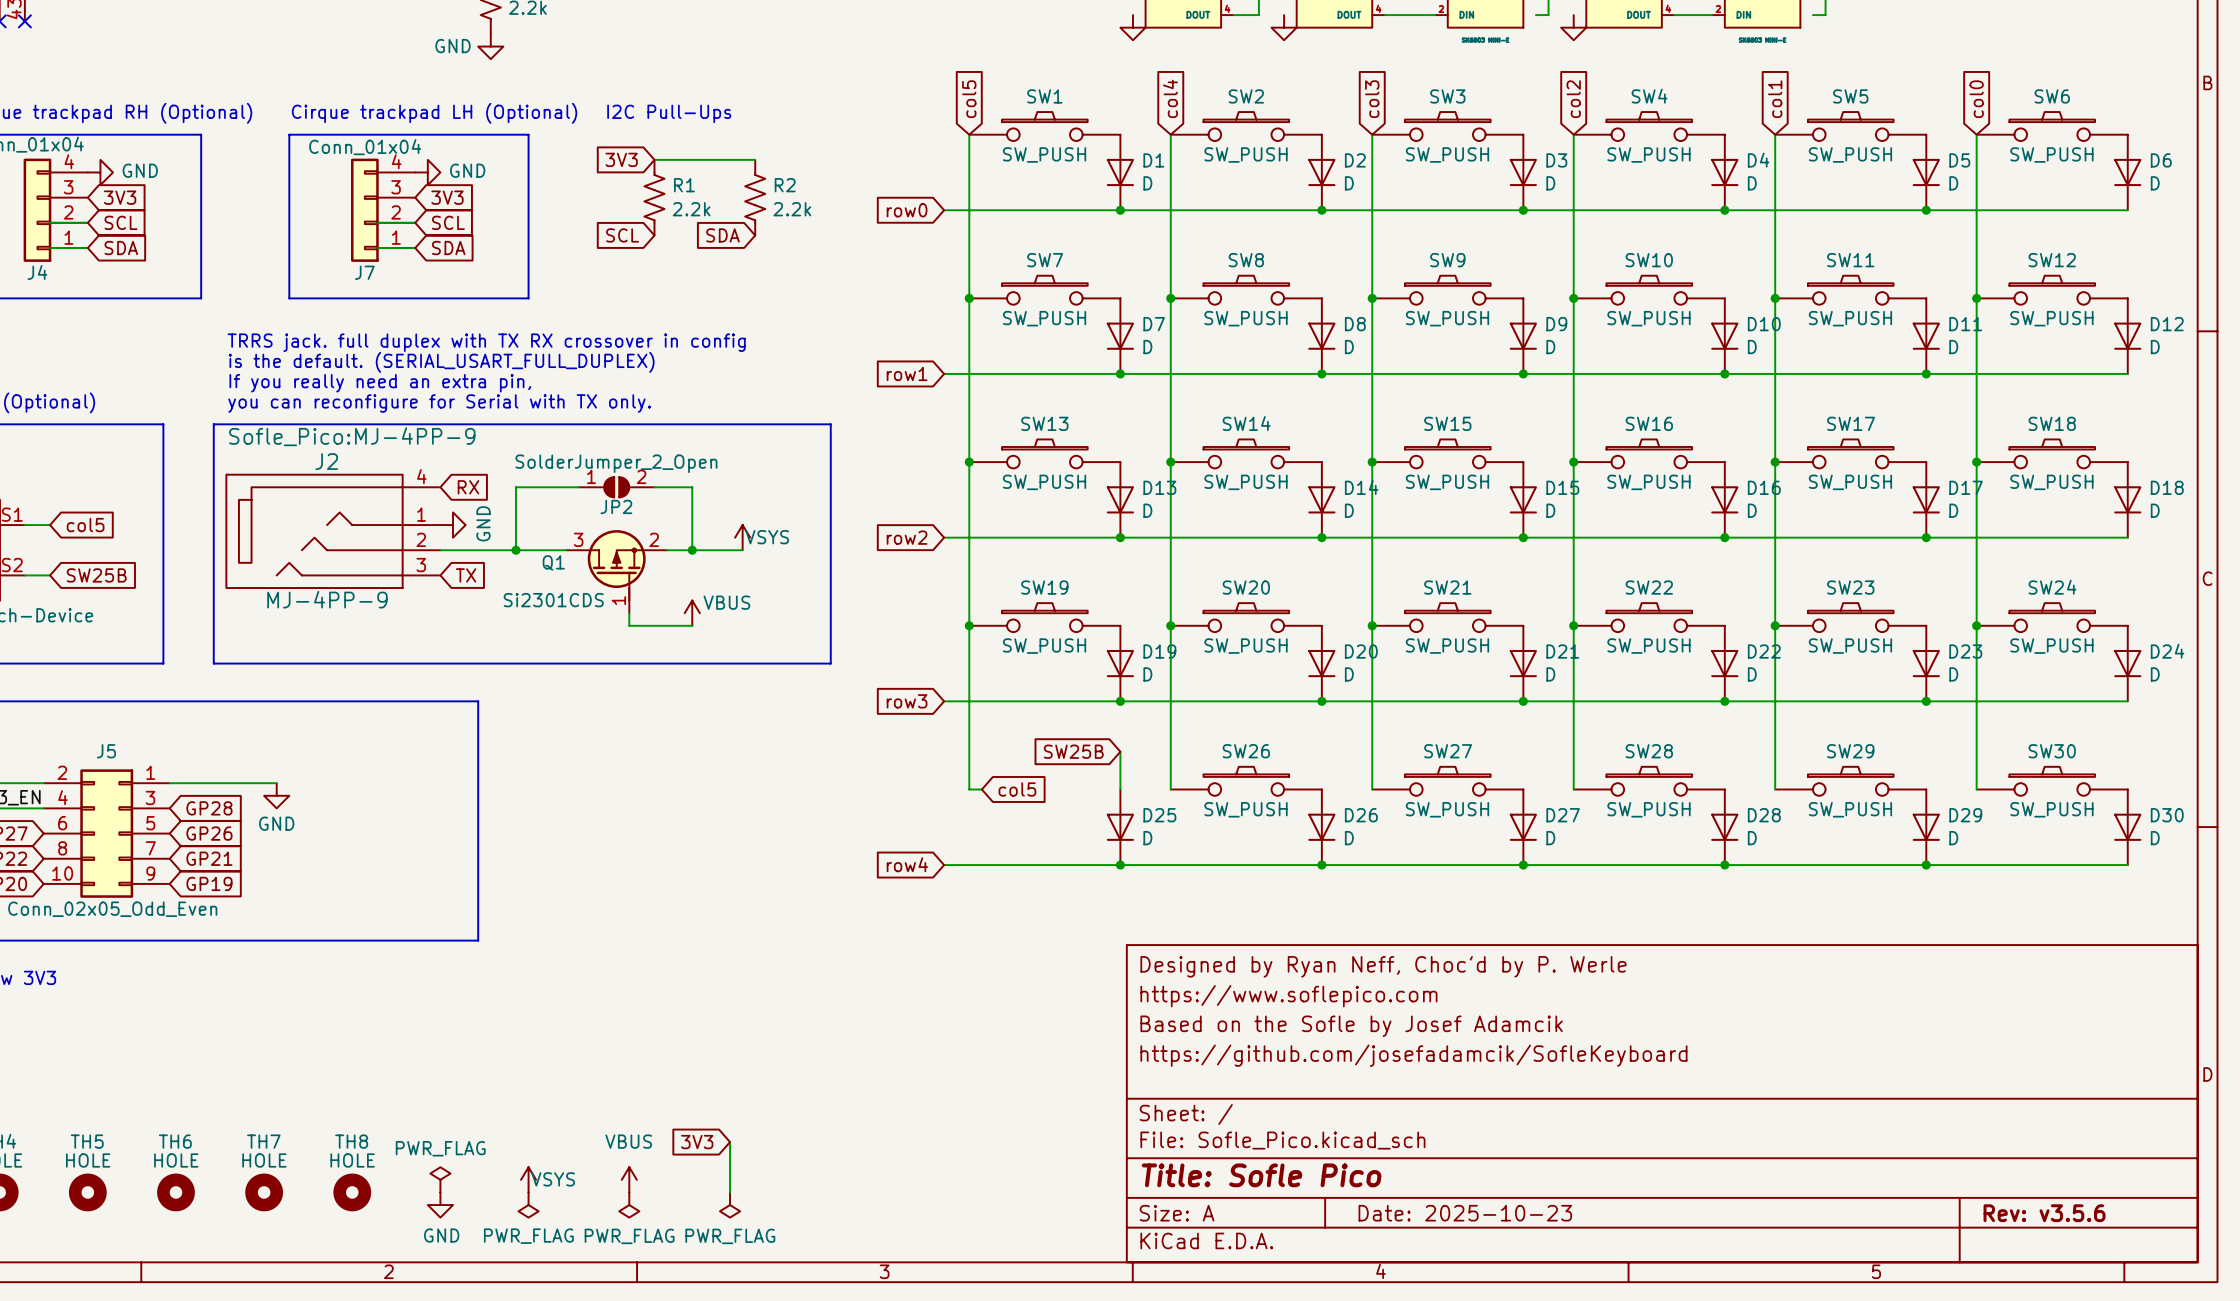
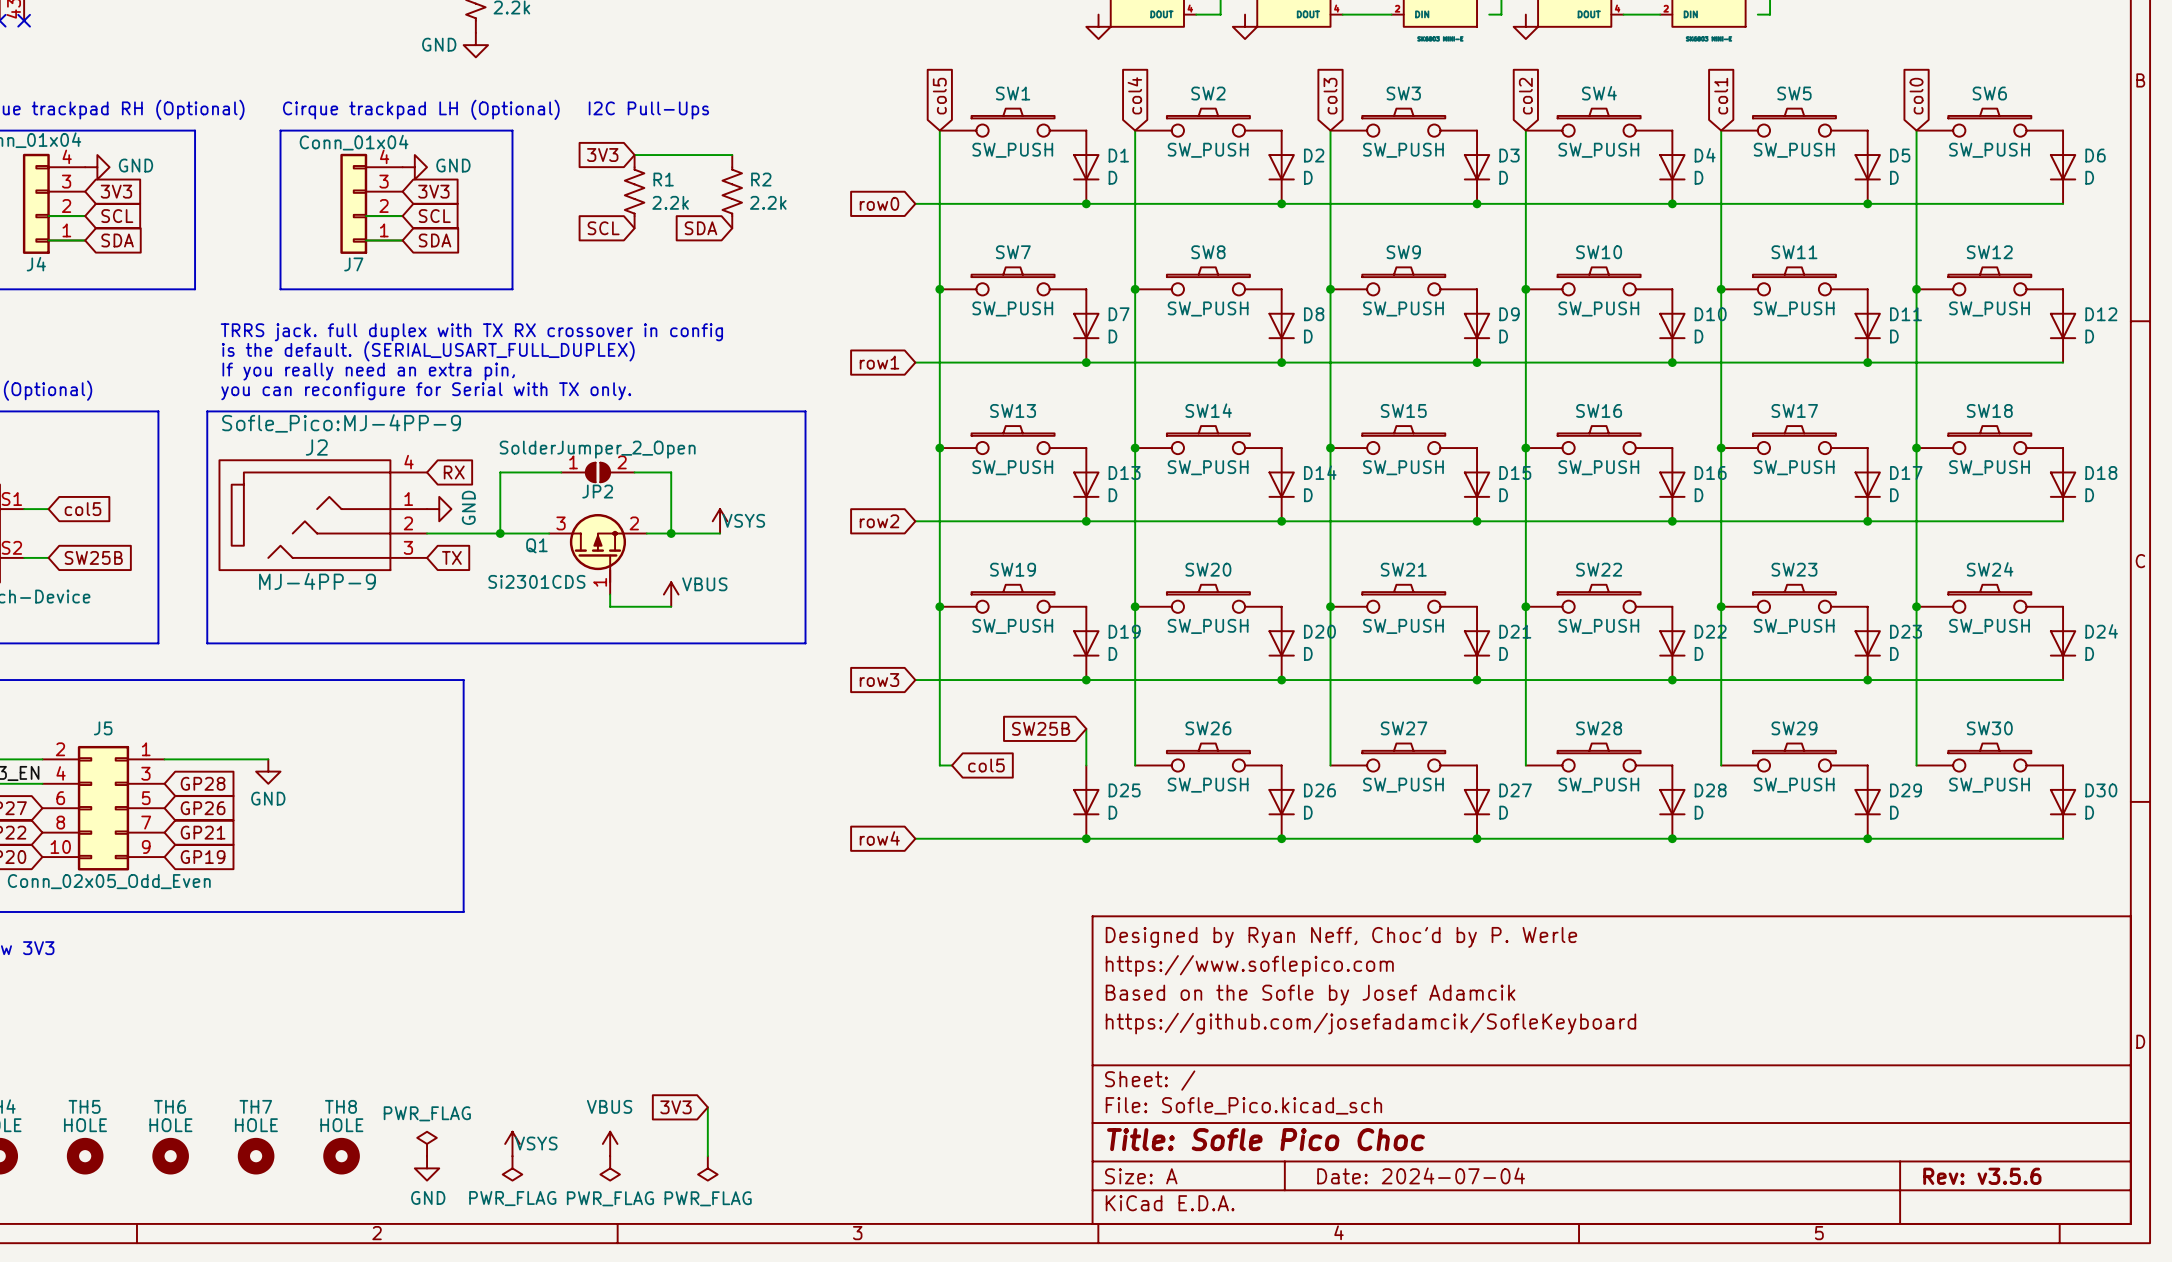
title block: Title: Sofle Pico (1261, 1175) -> Title: Sofle Pico Choc (1265, 1139)
title block: Date: 2025-10-23 (1465, 1213) -> Date: 2024-07-04 (1421, 1175)

